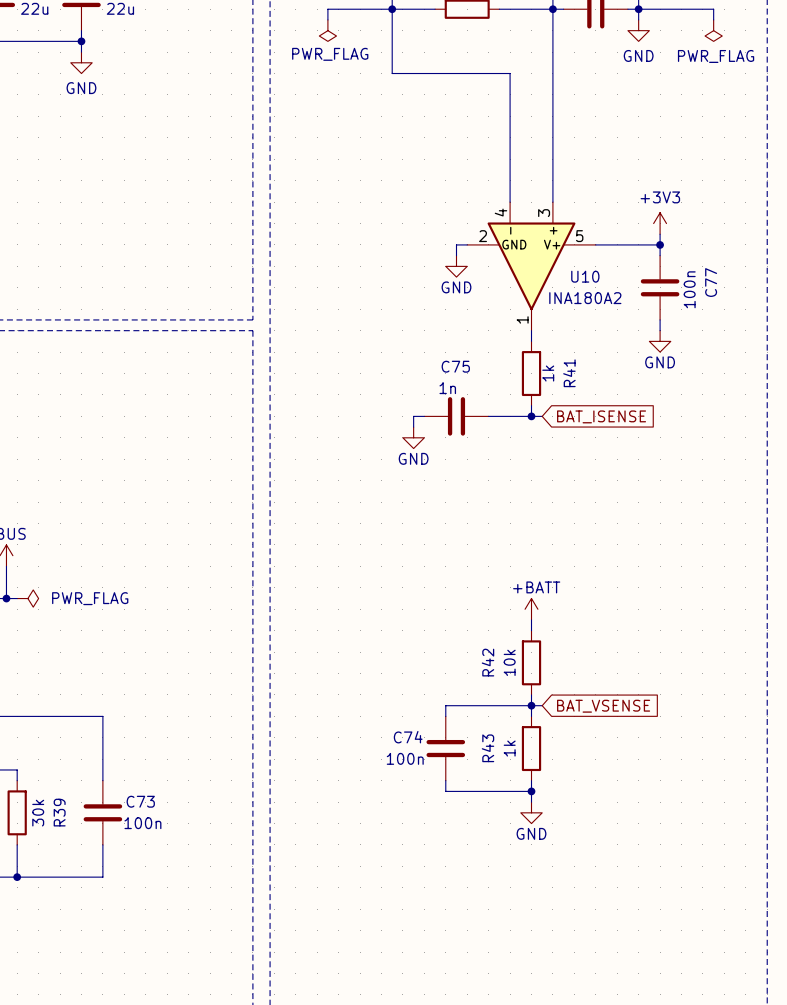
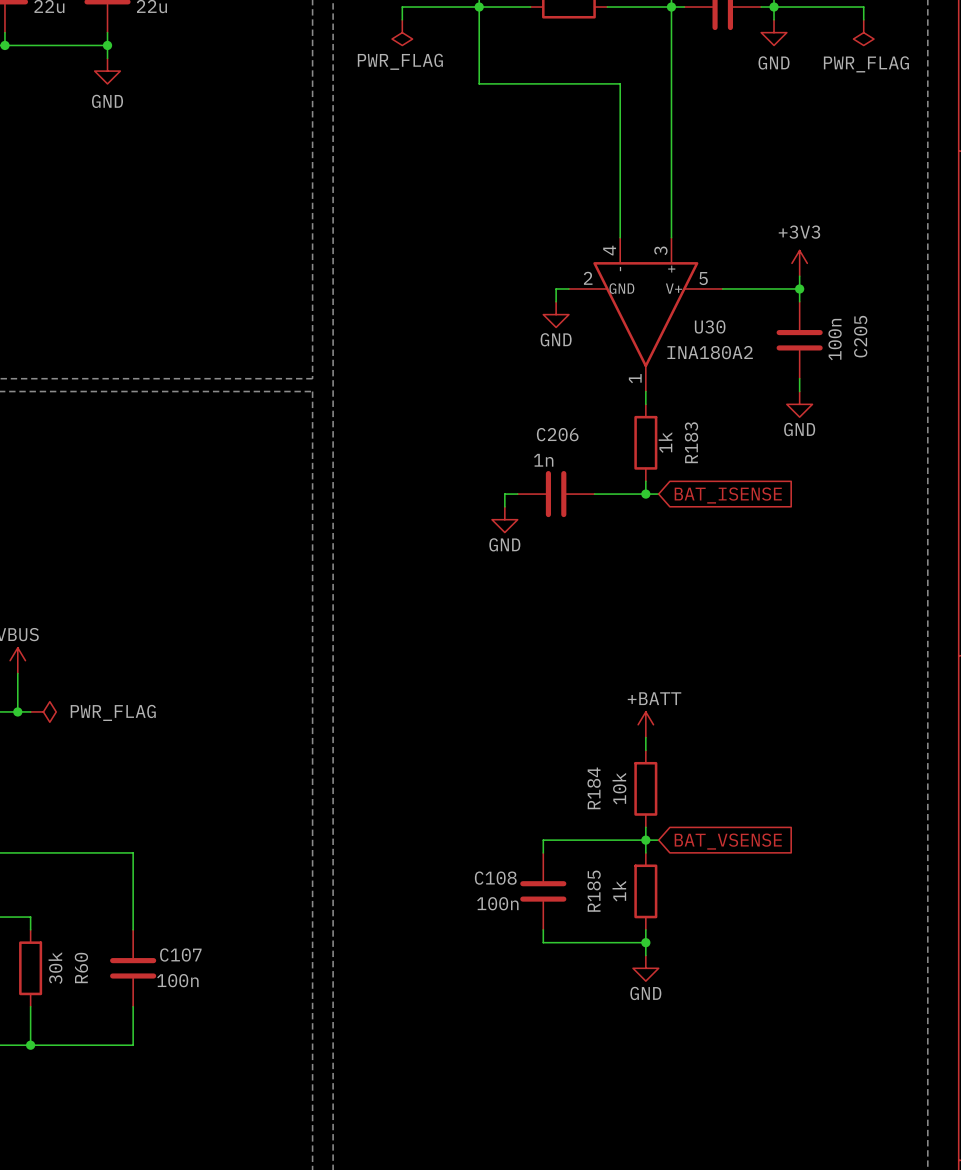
U10 name: U10 (585, 276) -> U30 (710, 326)
C77 name: C77 (711, 282) -> C205 (860, 336)
C75 name: C75 (455, 366) -> C206 (557, 434)
R41 name: R41 (569, 373) -> R183 (691, 442)
R42 name: R42 (487, 662) -> R184 (594, 788)
C74 name: C74 (408, 737) -> C108 (495, 878)
R43 name: R43 (487, 748) -> R185 (594, 891)
C73 name: C73 (140, 801) -> C107 (180, 955)
R39 name: R39 (59, 812) -> R60 (81, 967)

